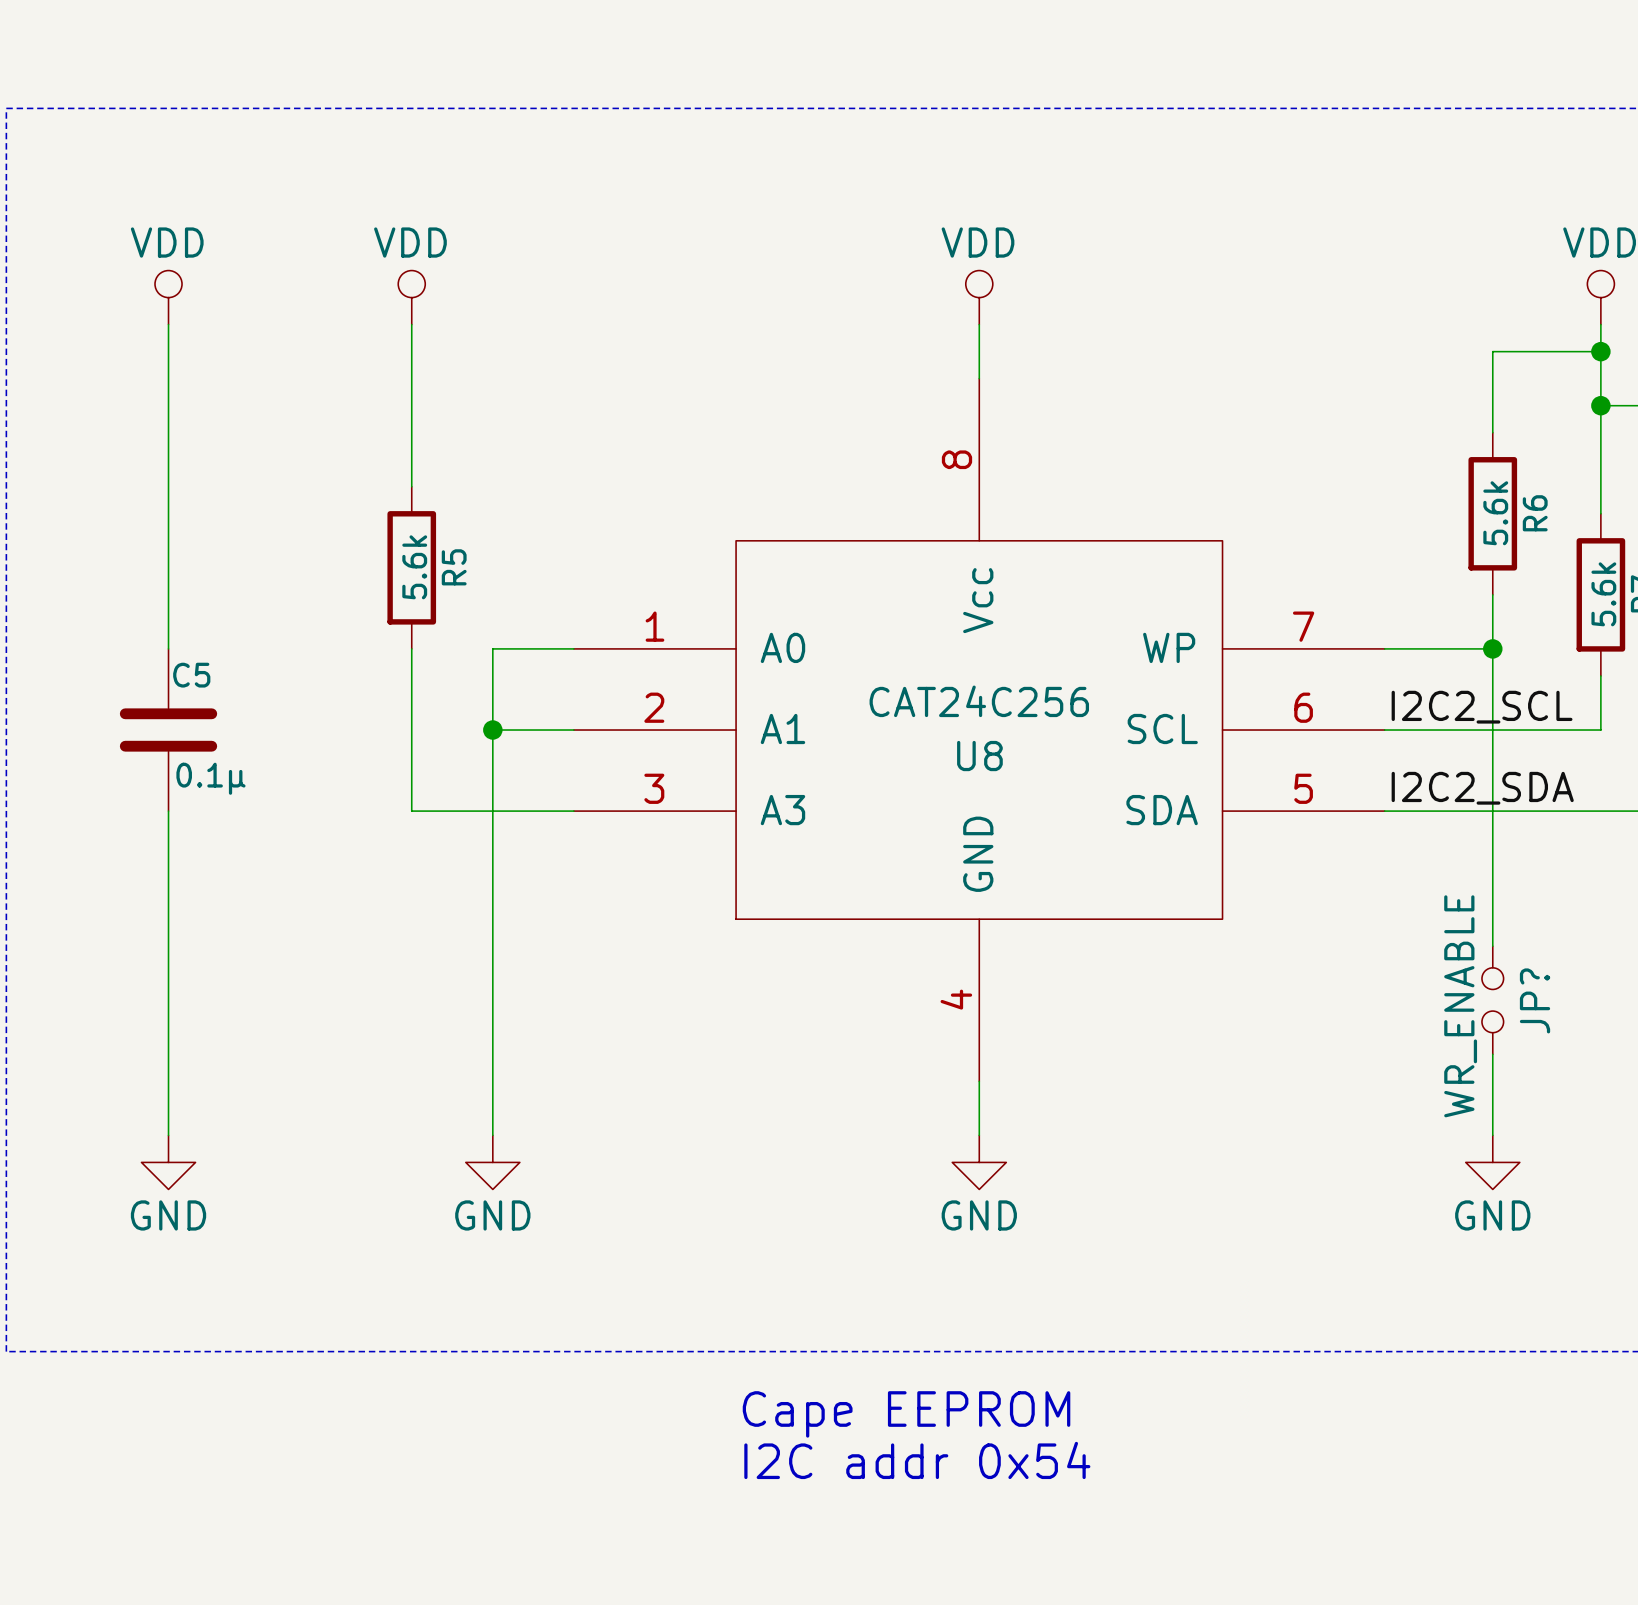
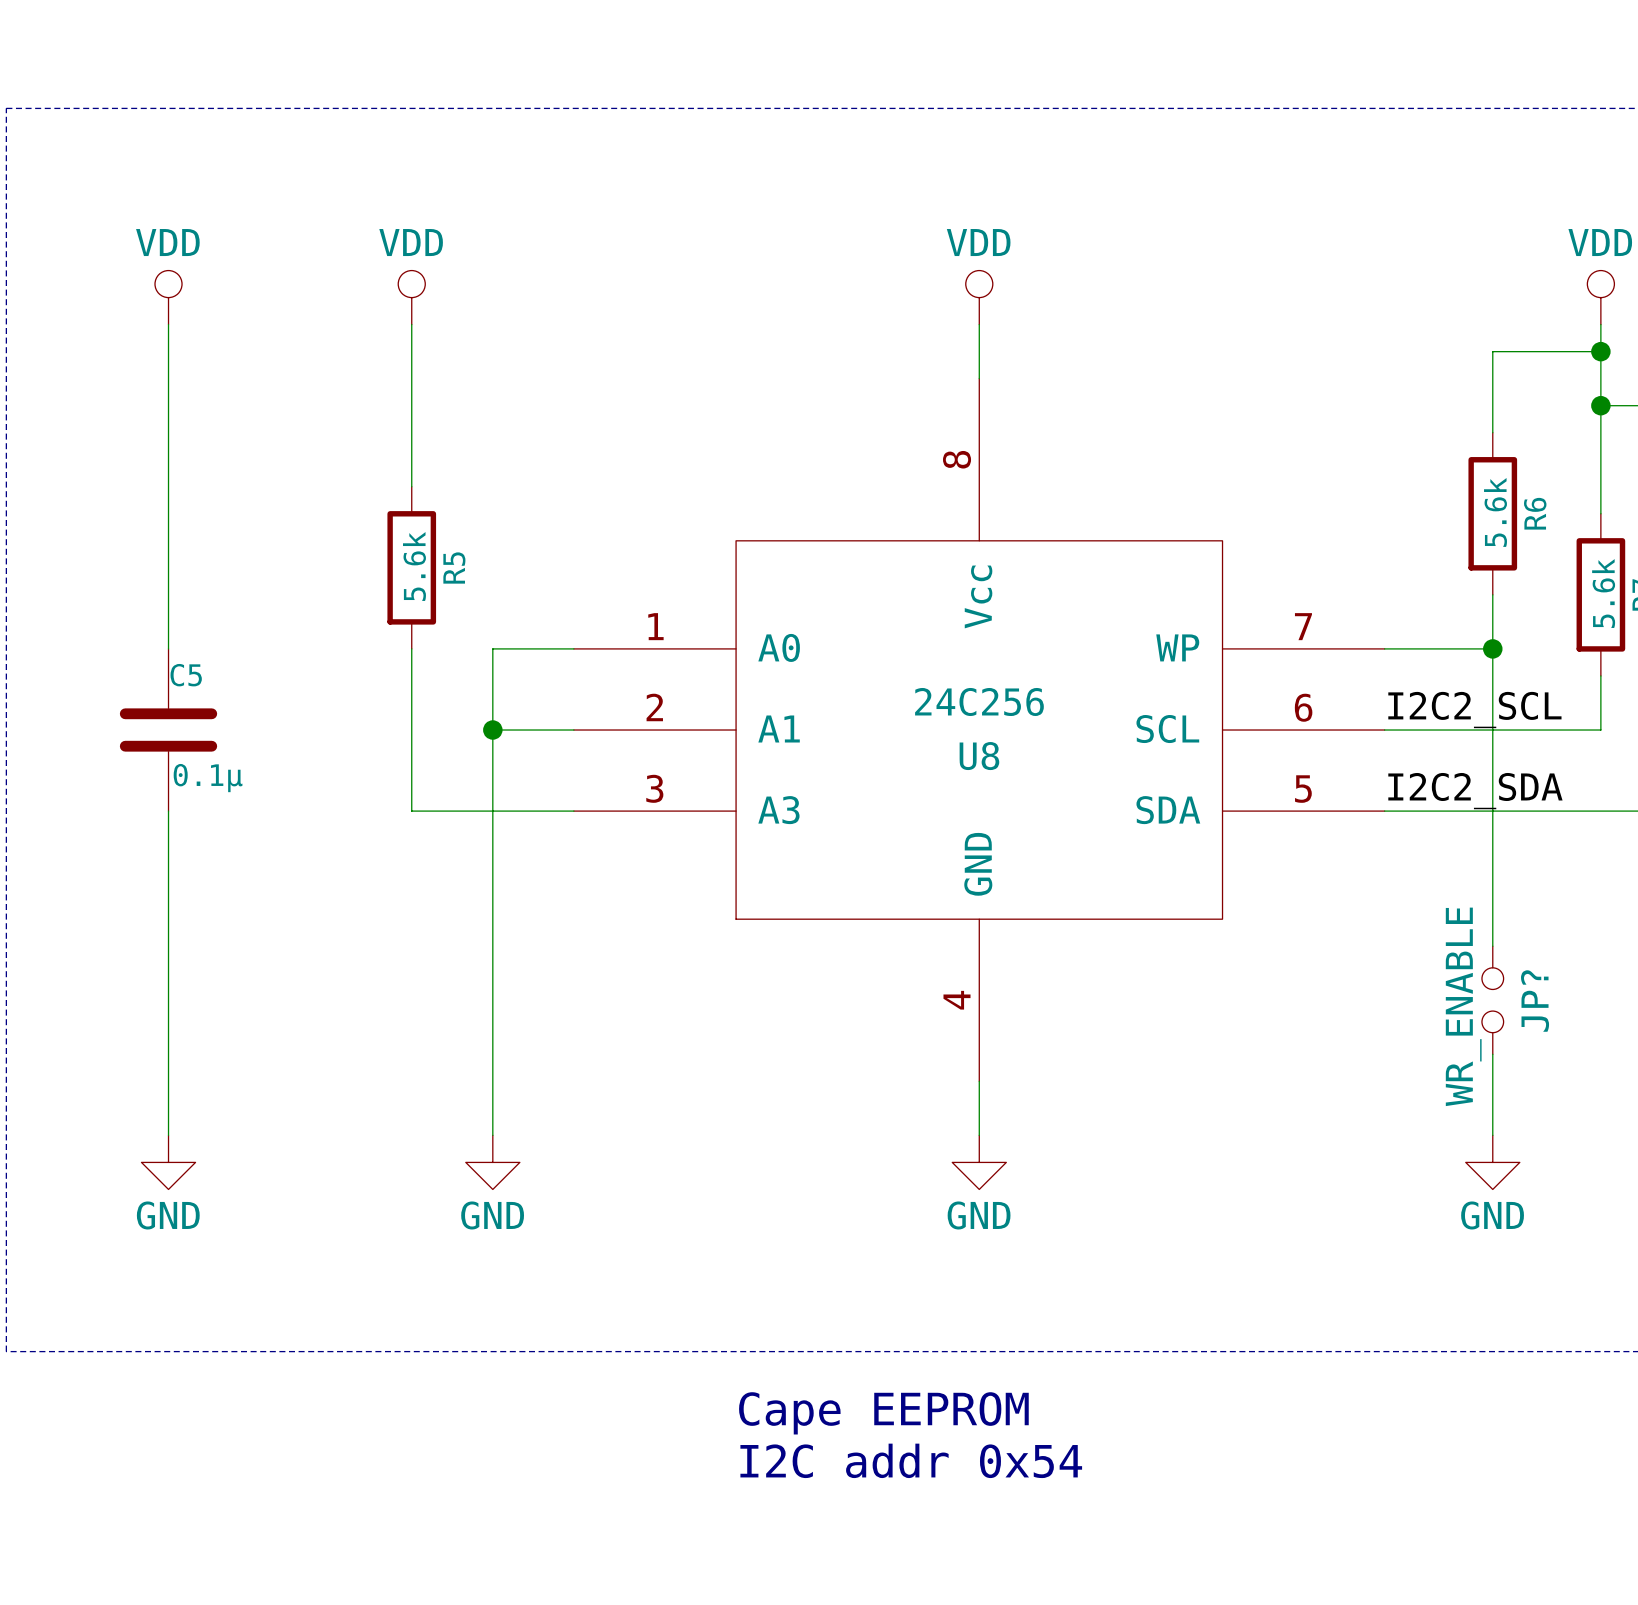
U8 value: CAT24C256 (979, 701) -> 24C256 (979, 701)

